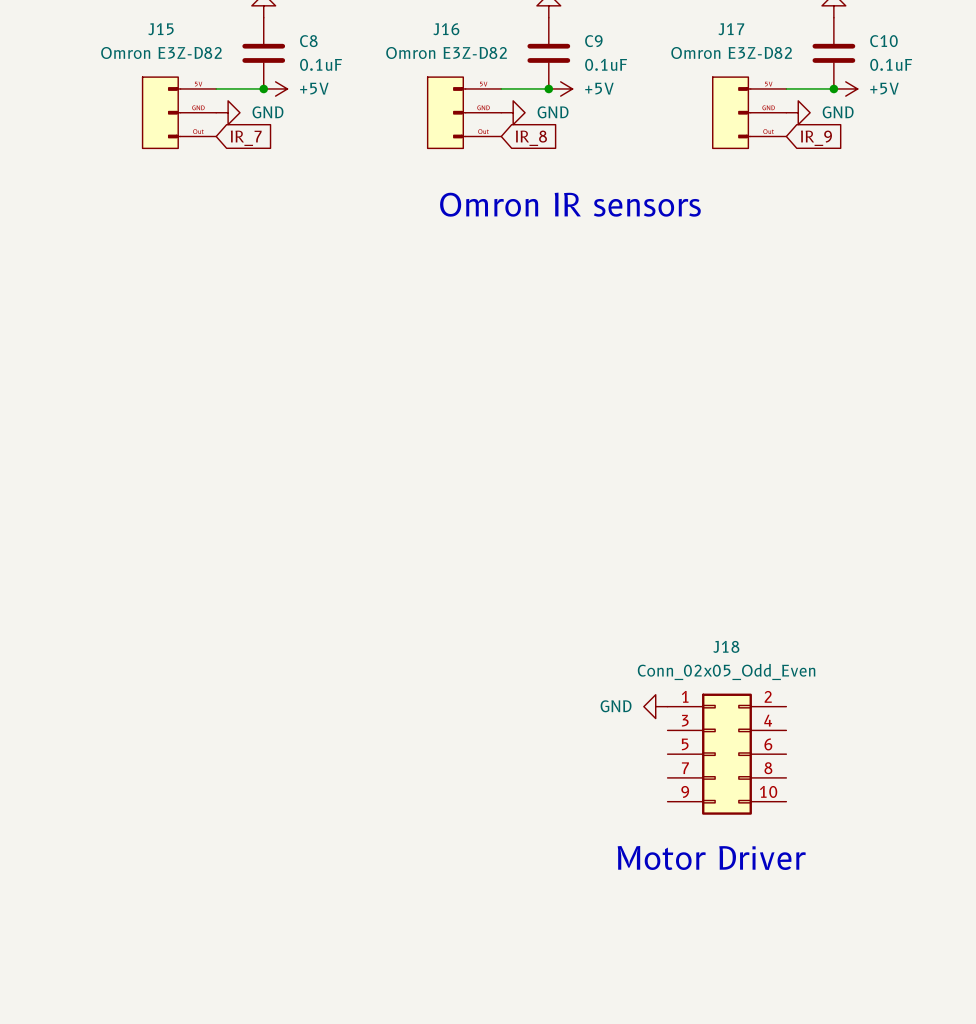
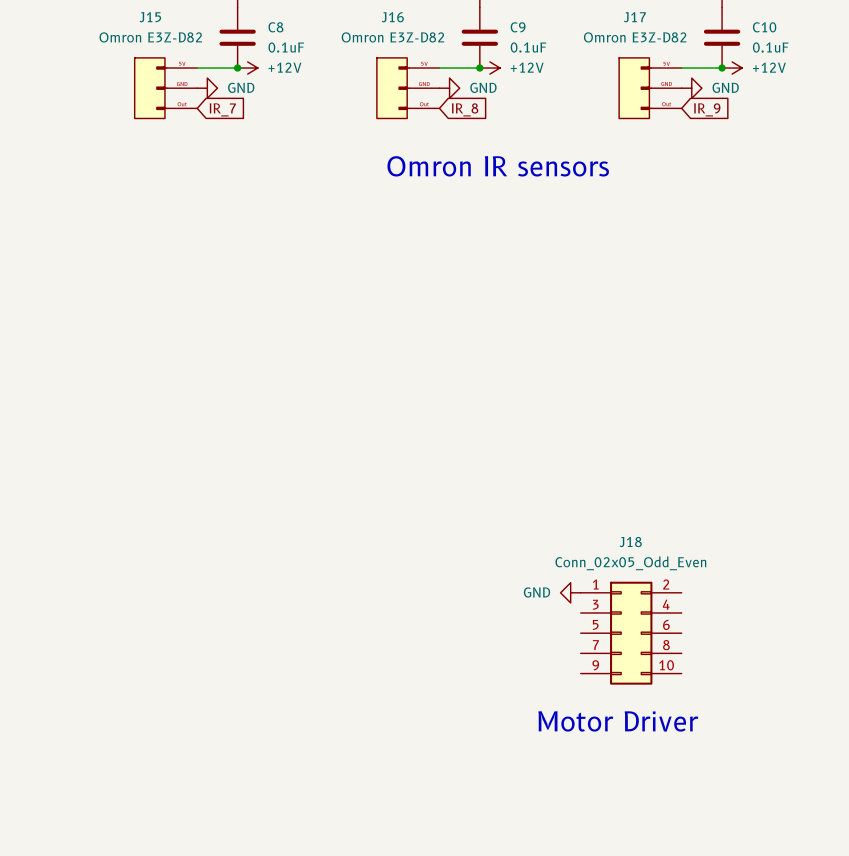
power symbol: +5V (275, 88) -> +12V (247, 68)
power symbol: +5V (560, 88) -> +12V (489, 68)
power symbol: +5V (845, 88) -> +12V (732, 68)

